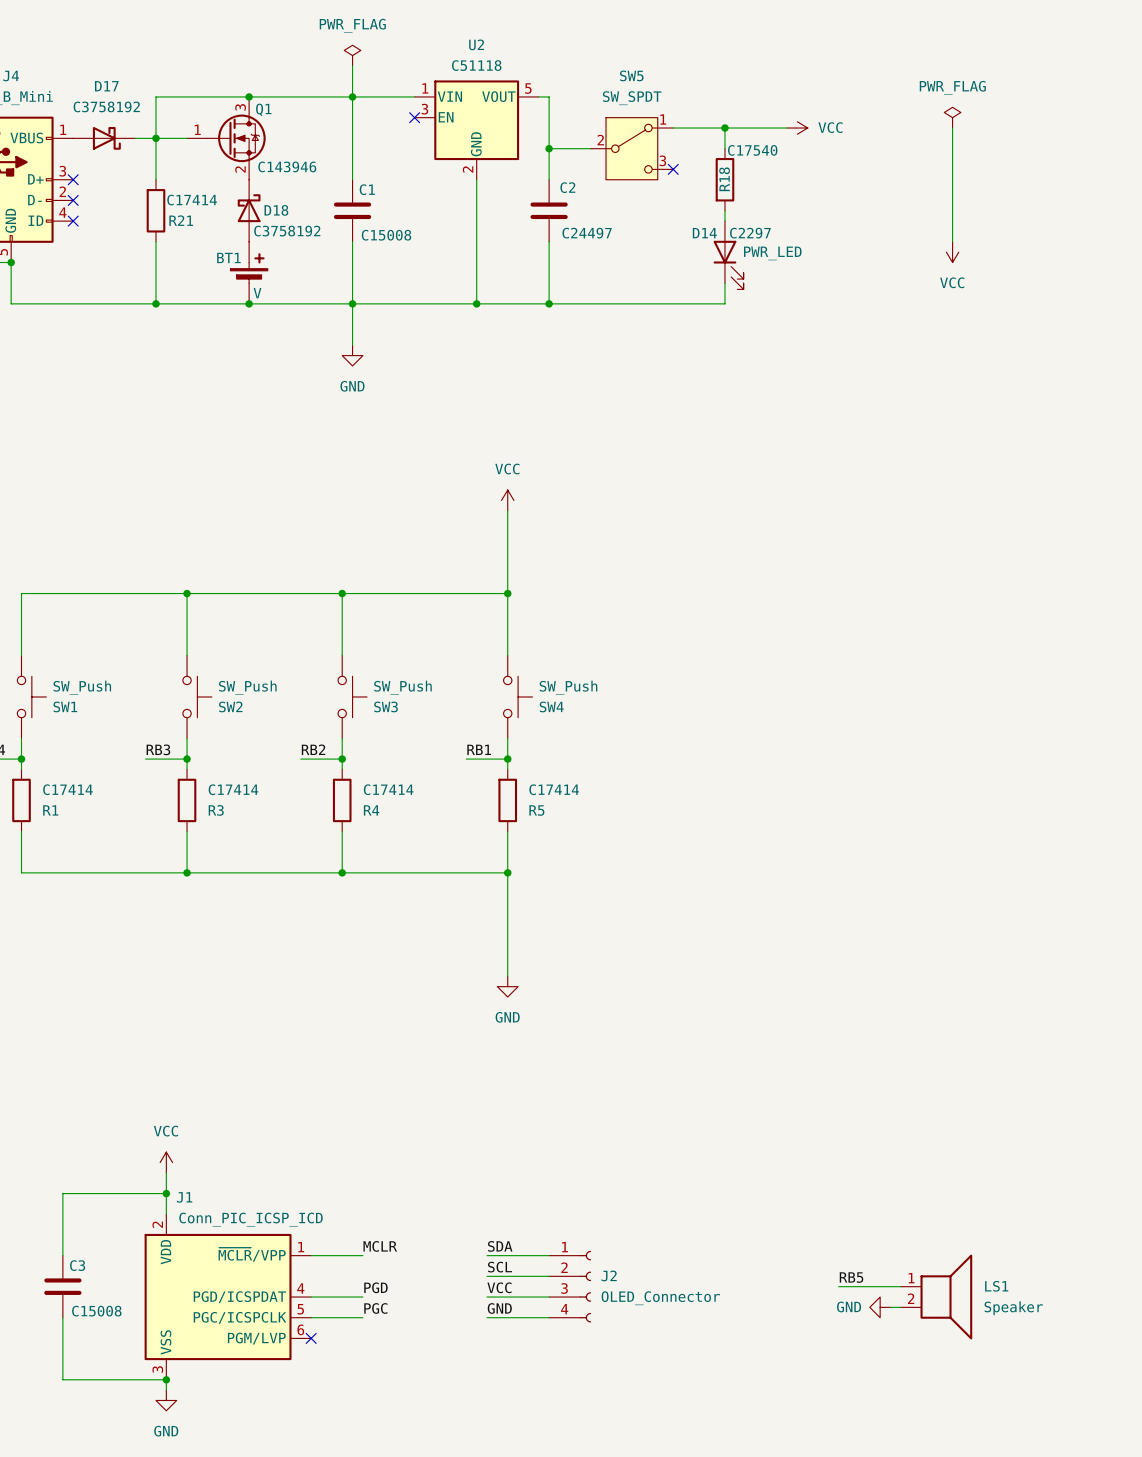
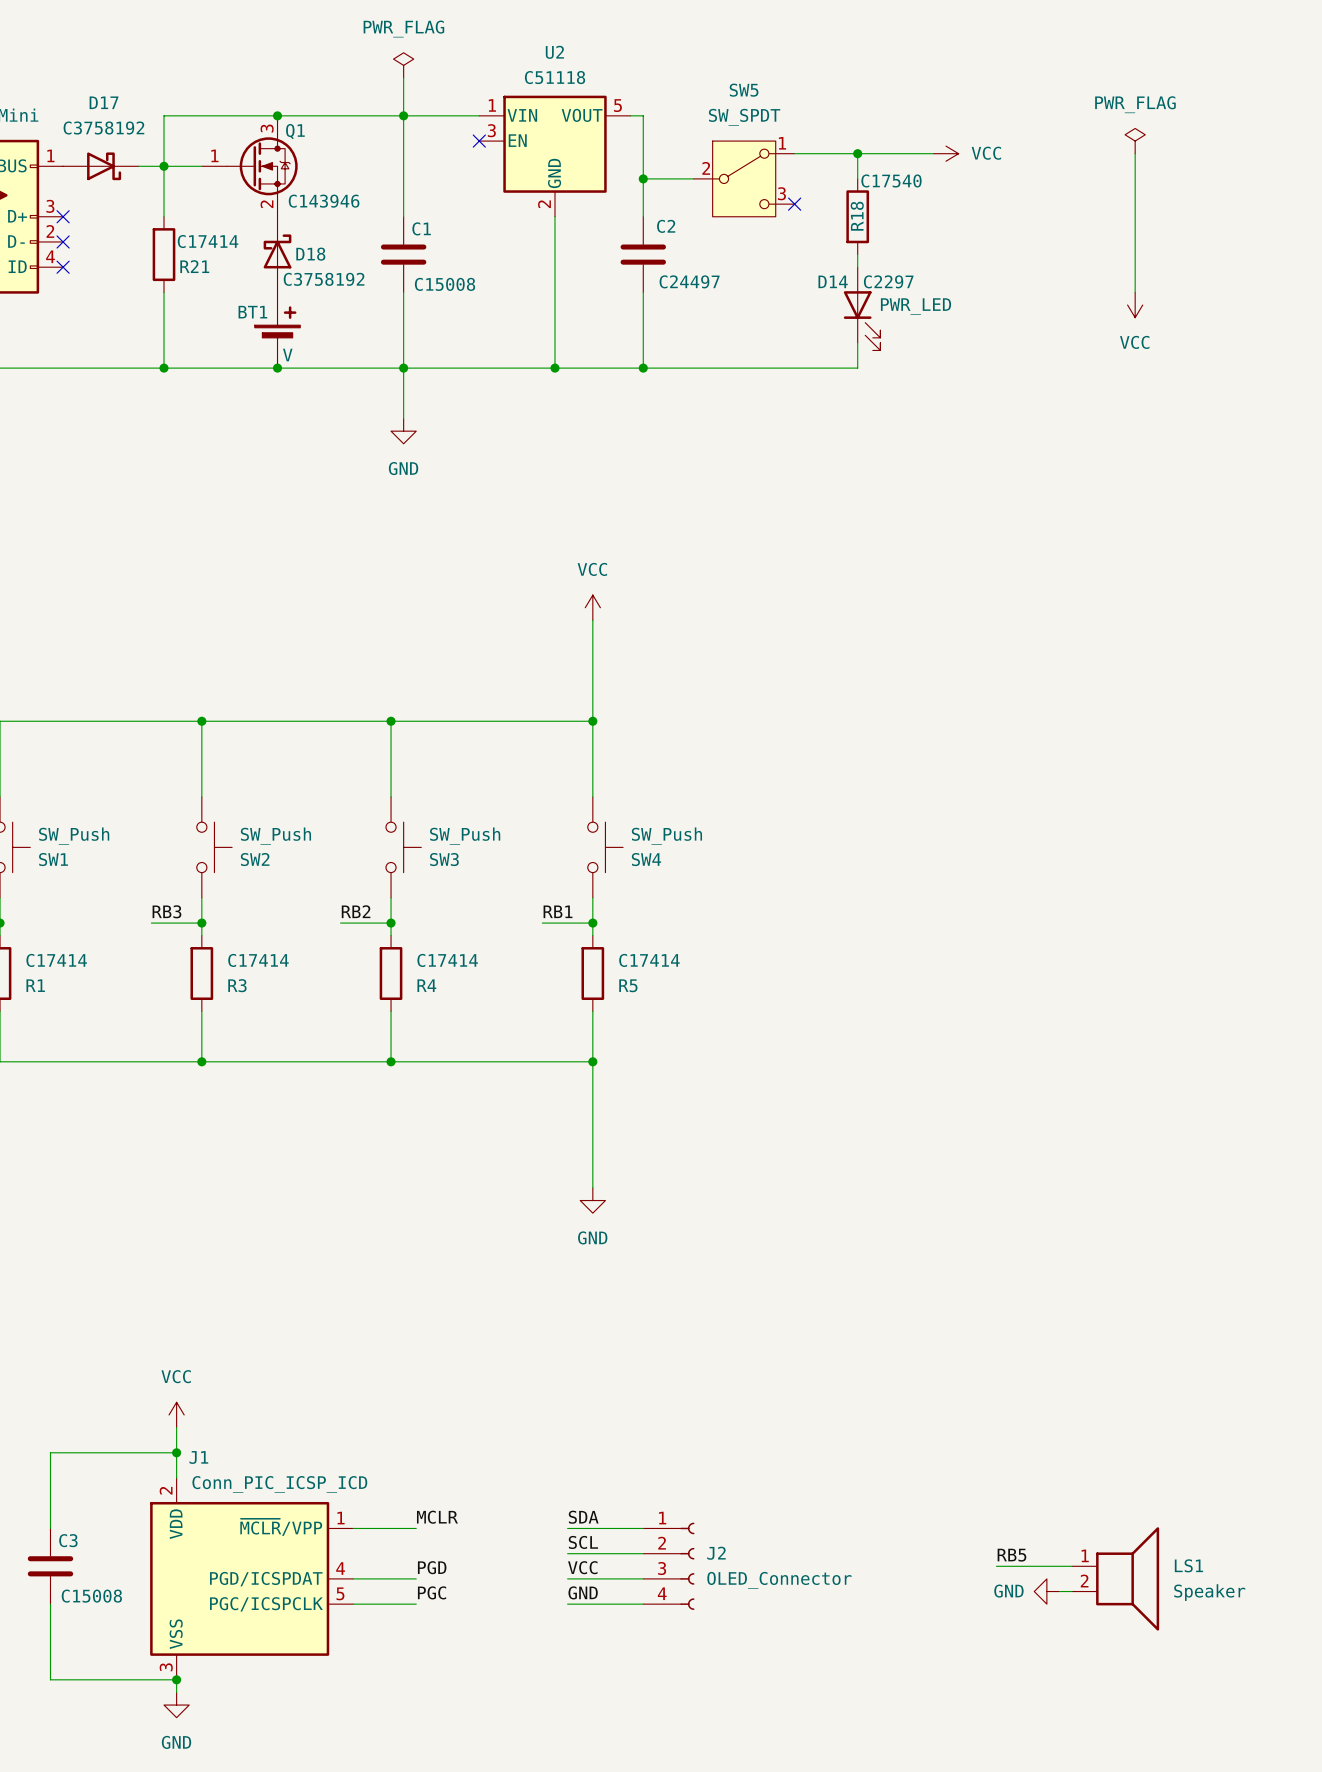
J1 symbol: [144, 1214, 312, 1380] -> [150, 1478, 354, 1680]
no-connect mark: (311, 1338) -> none

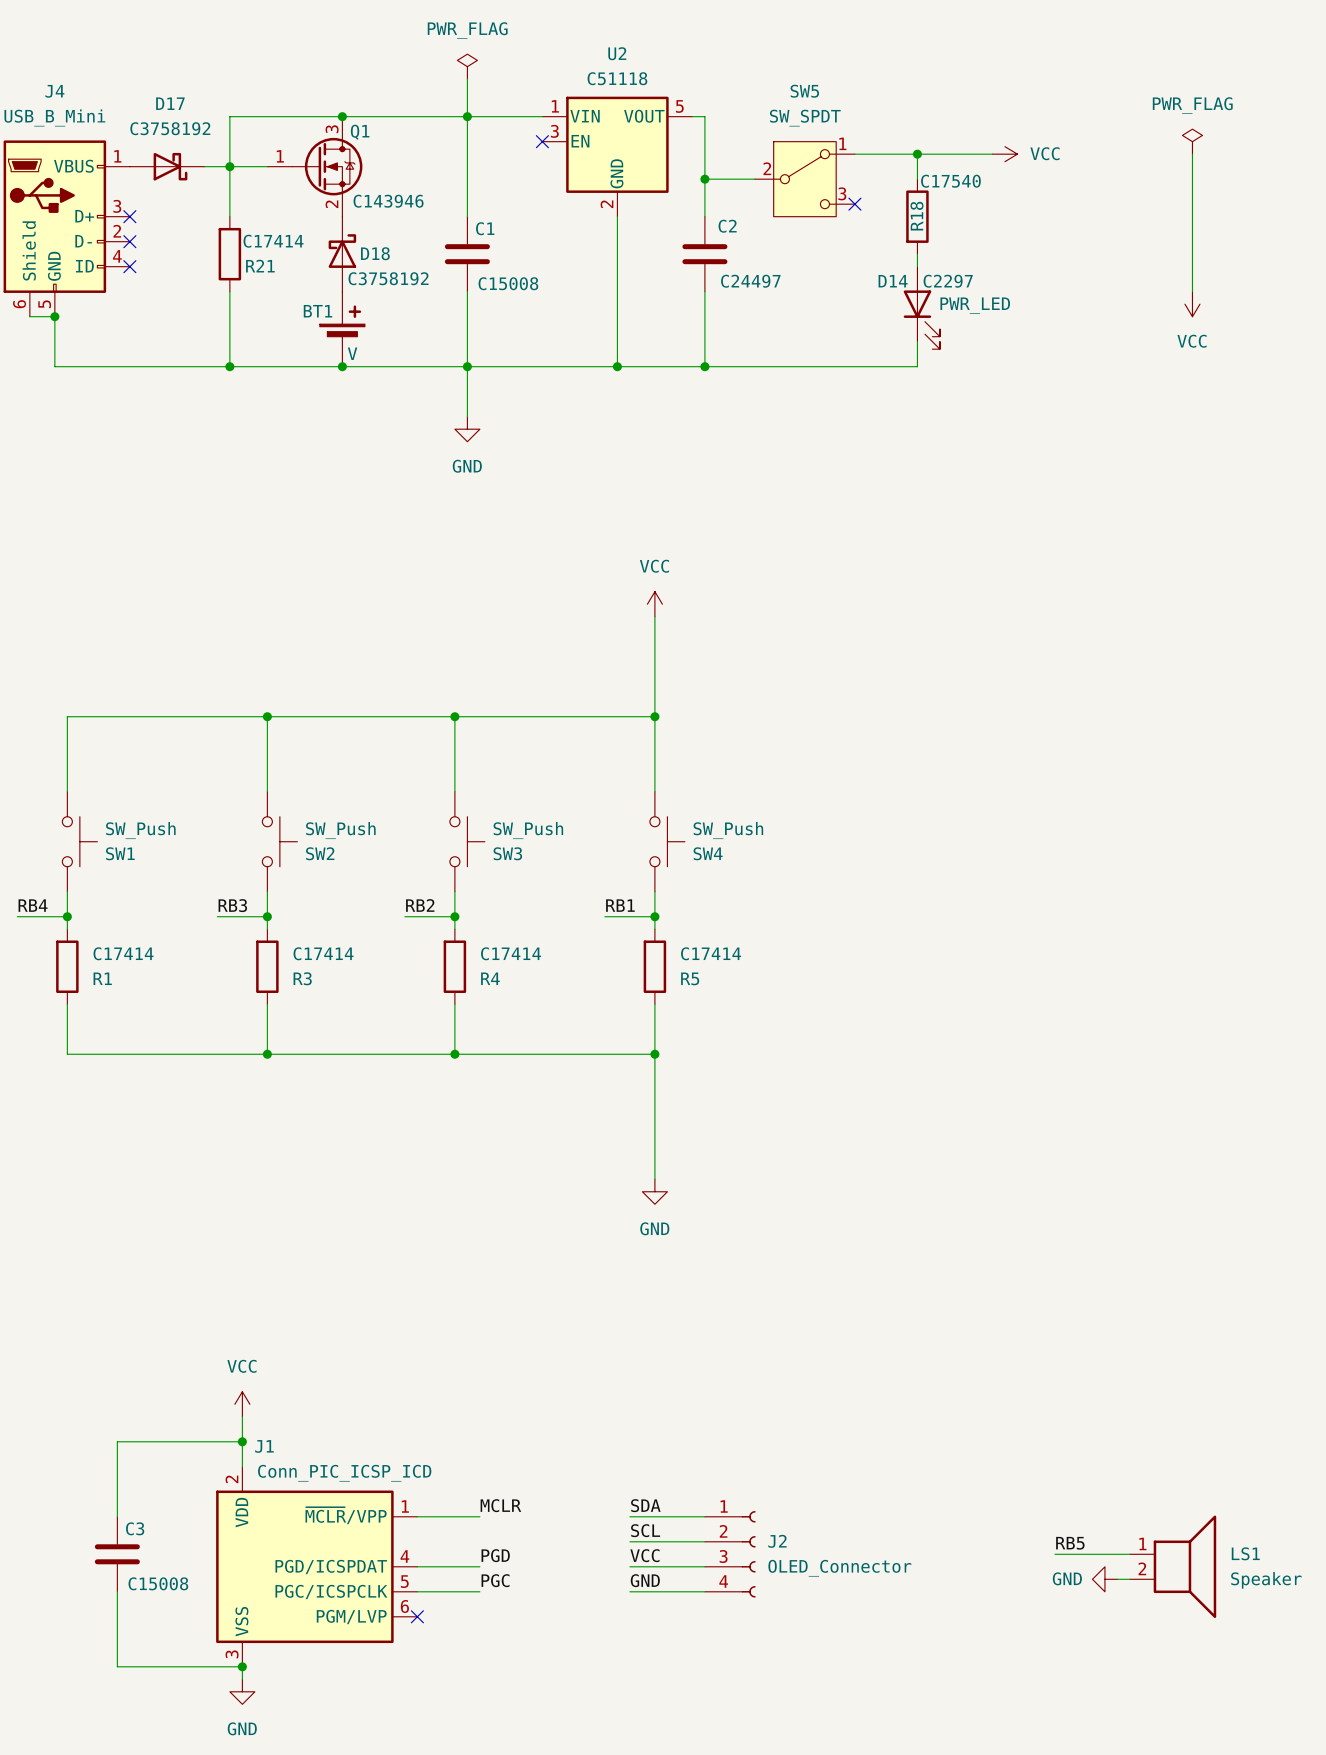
J1 symbol: [150, 1478, 354, 1680] -> [216, 1466, 418, 1667]
no-connect mark: none -> (417, 1616)

